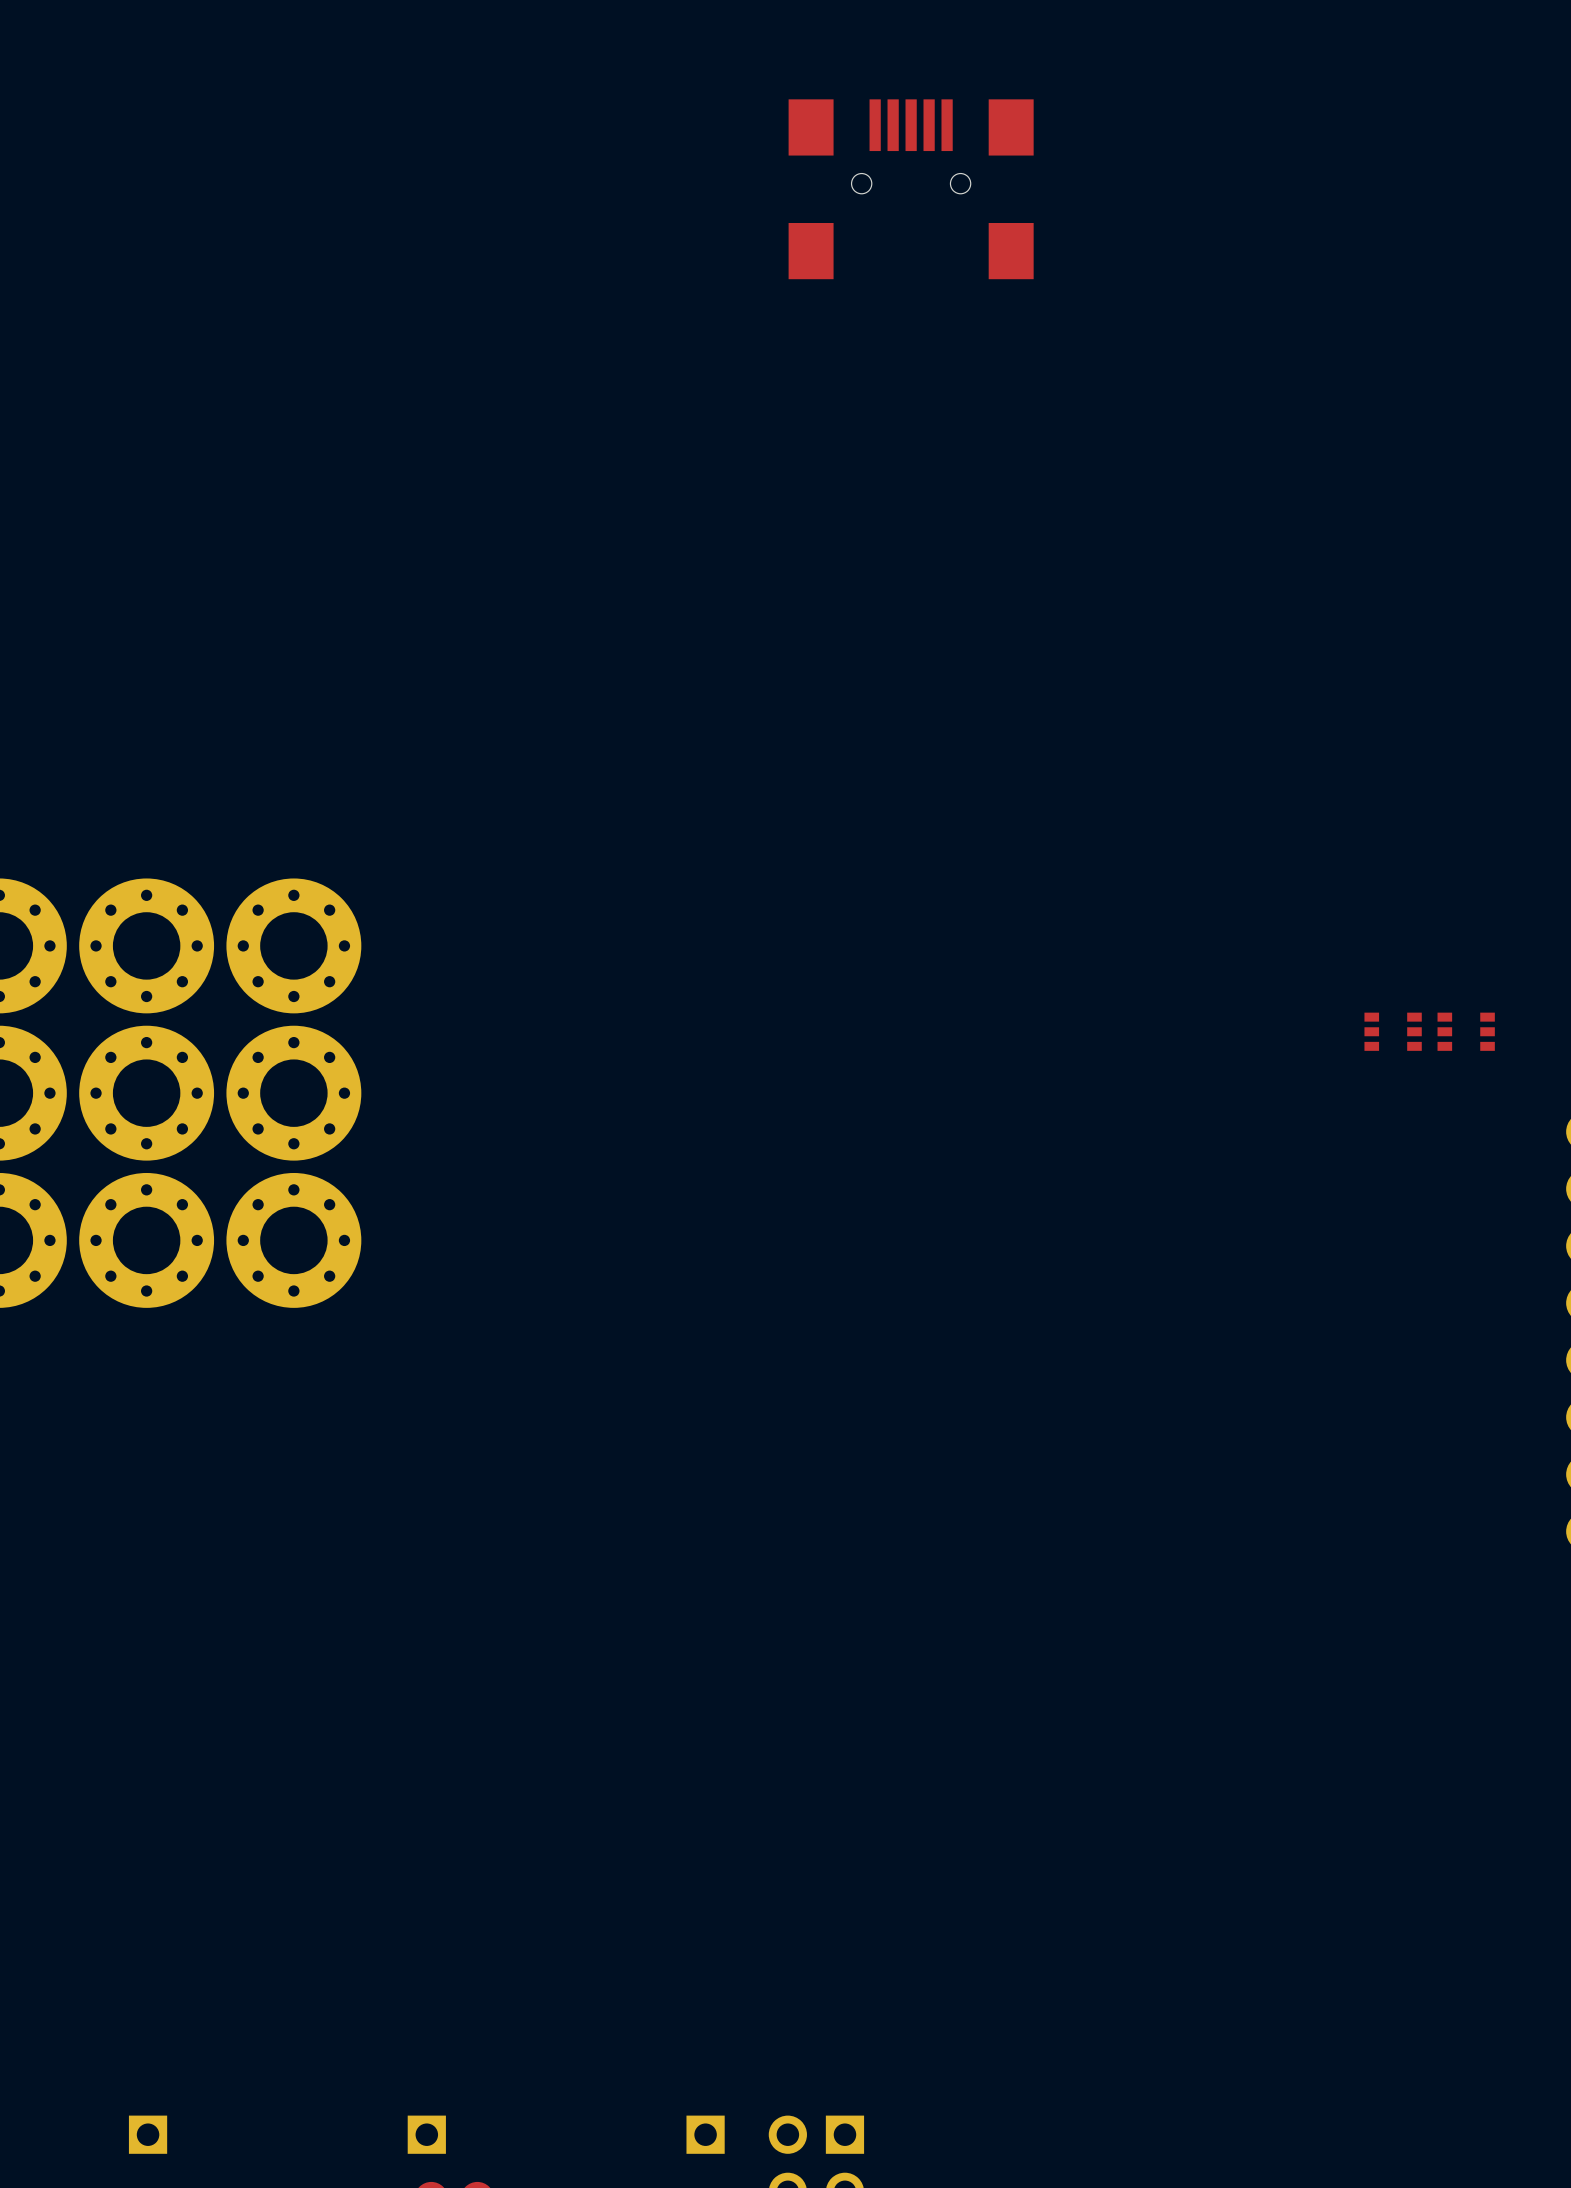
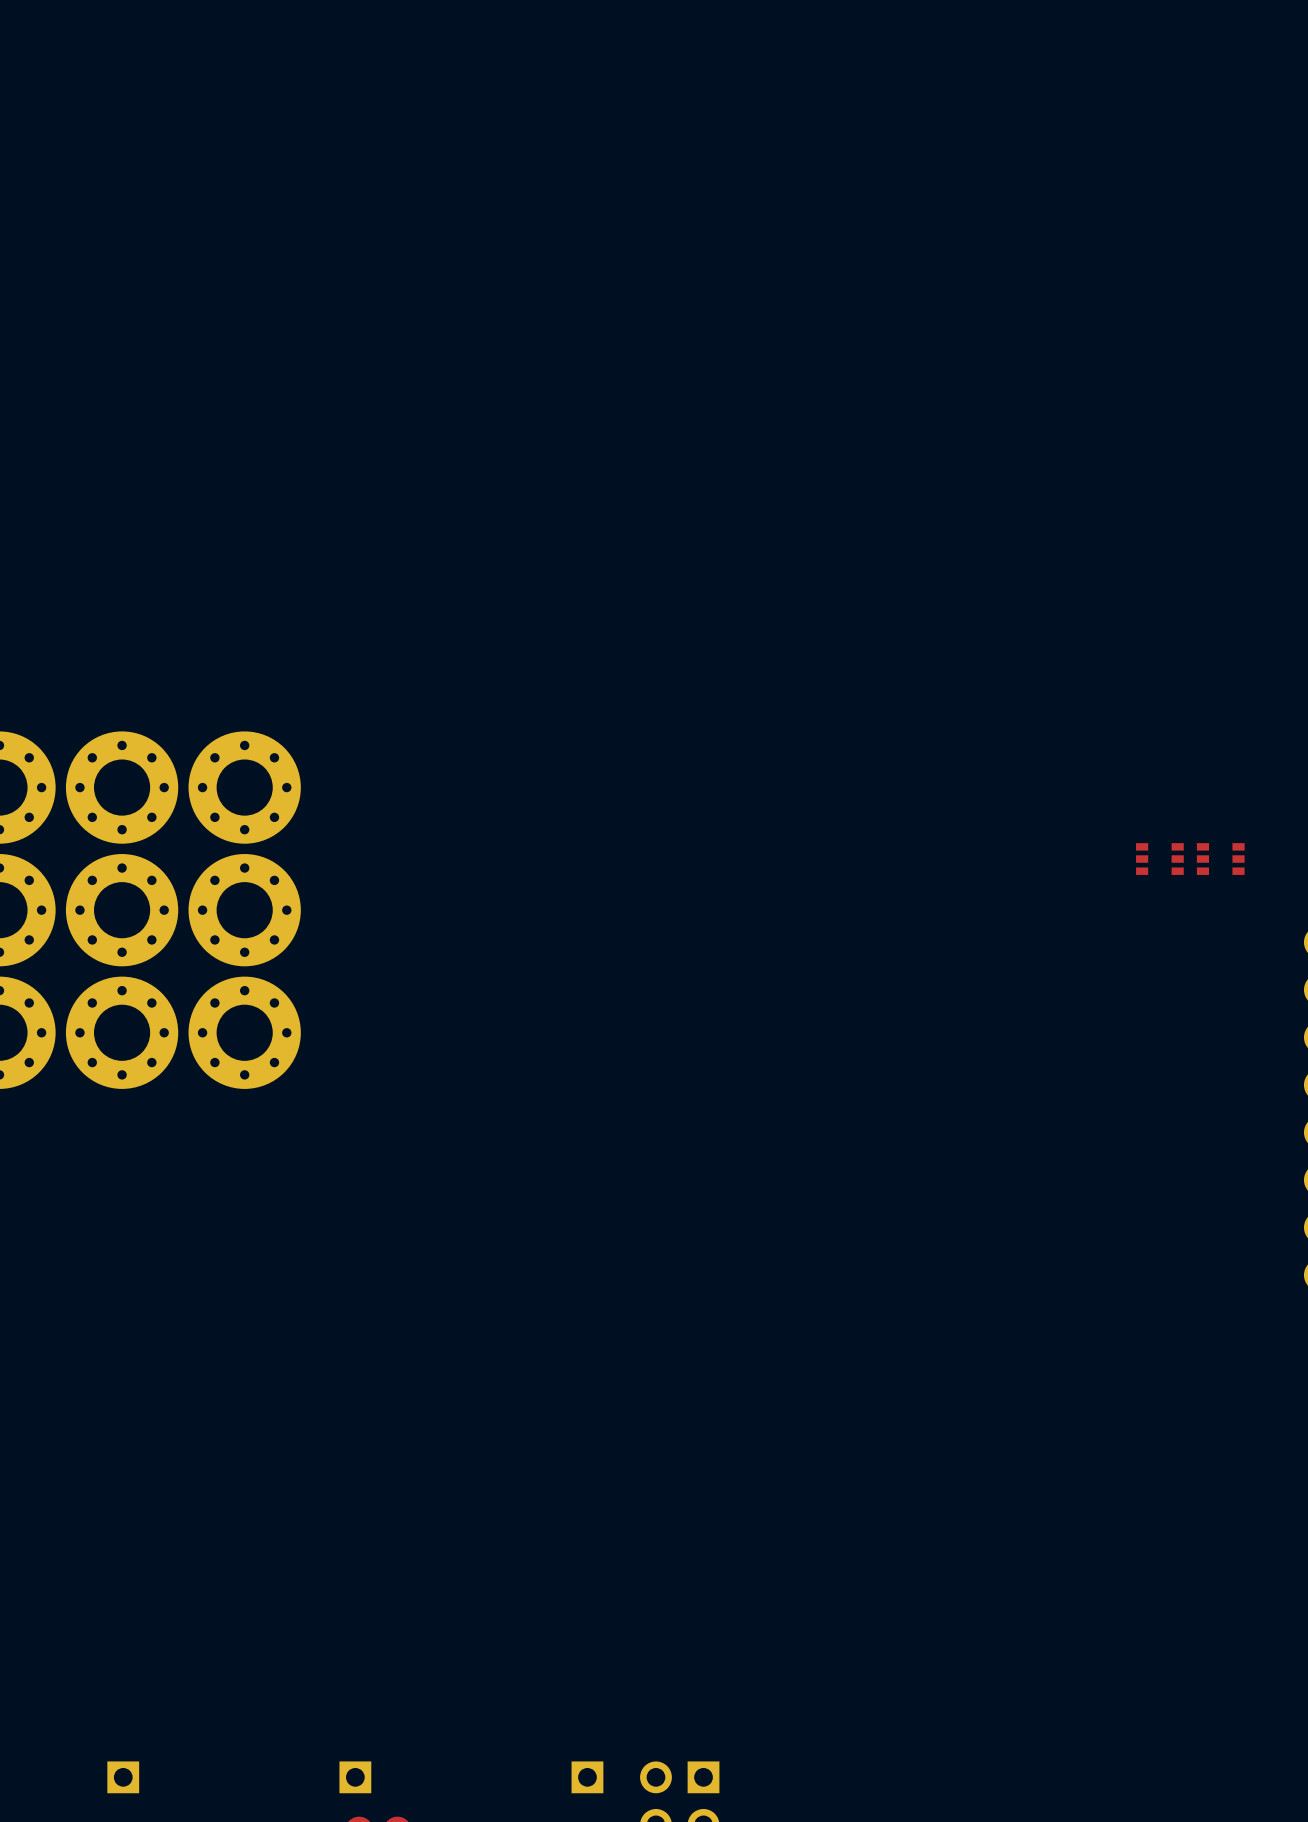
part: (911, 189) -> none

